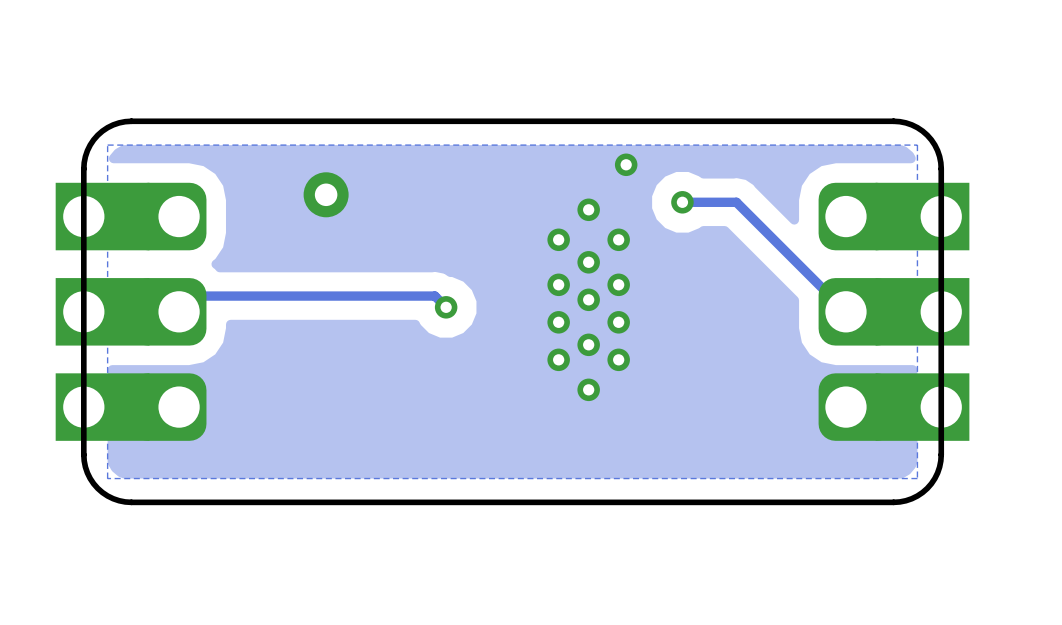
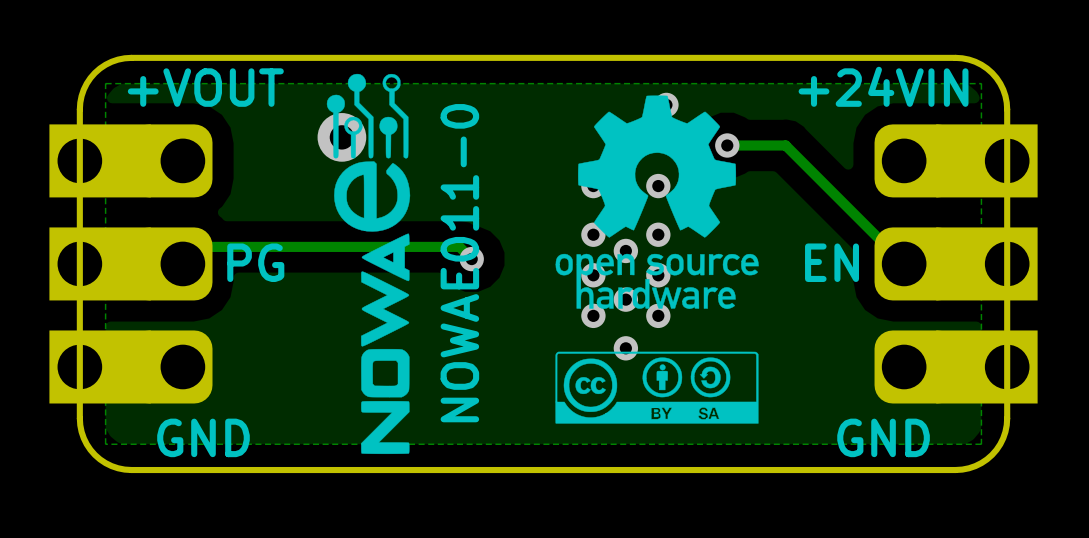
drawing: none -> [326, 73, 411, 455]
text: none -> +VOUT (205, 87)
text: none -> +24VIN (883, 86)
drawing: none -> [555, 95, 759, 424]
text: none -> PG (255, 262)
text: none -> EN (832, 262)
text: none -> NOWAE011-0 (459, 263)
text: none -> GND (203, 437)
text: none -> GND (883, 437)

